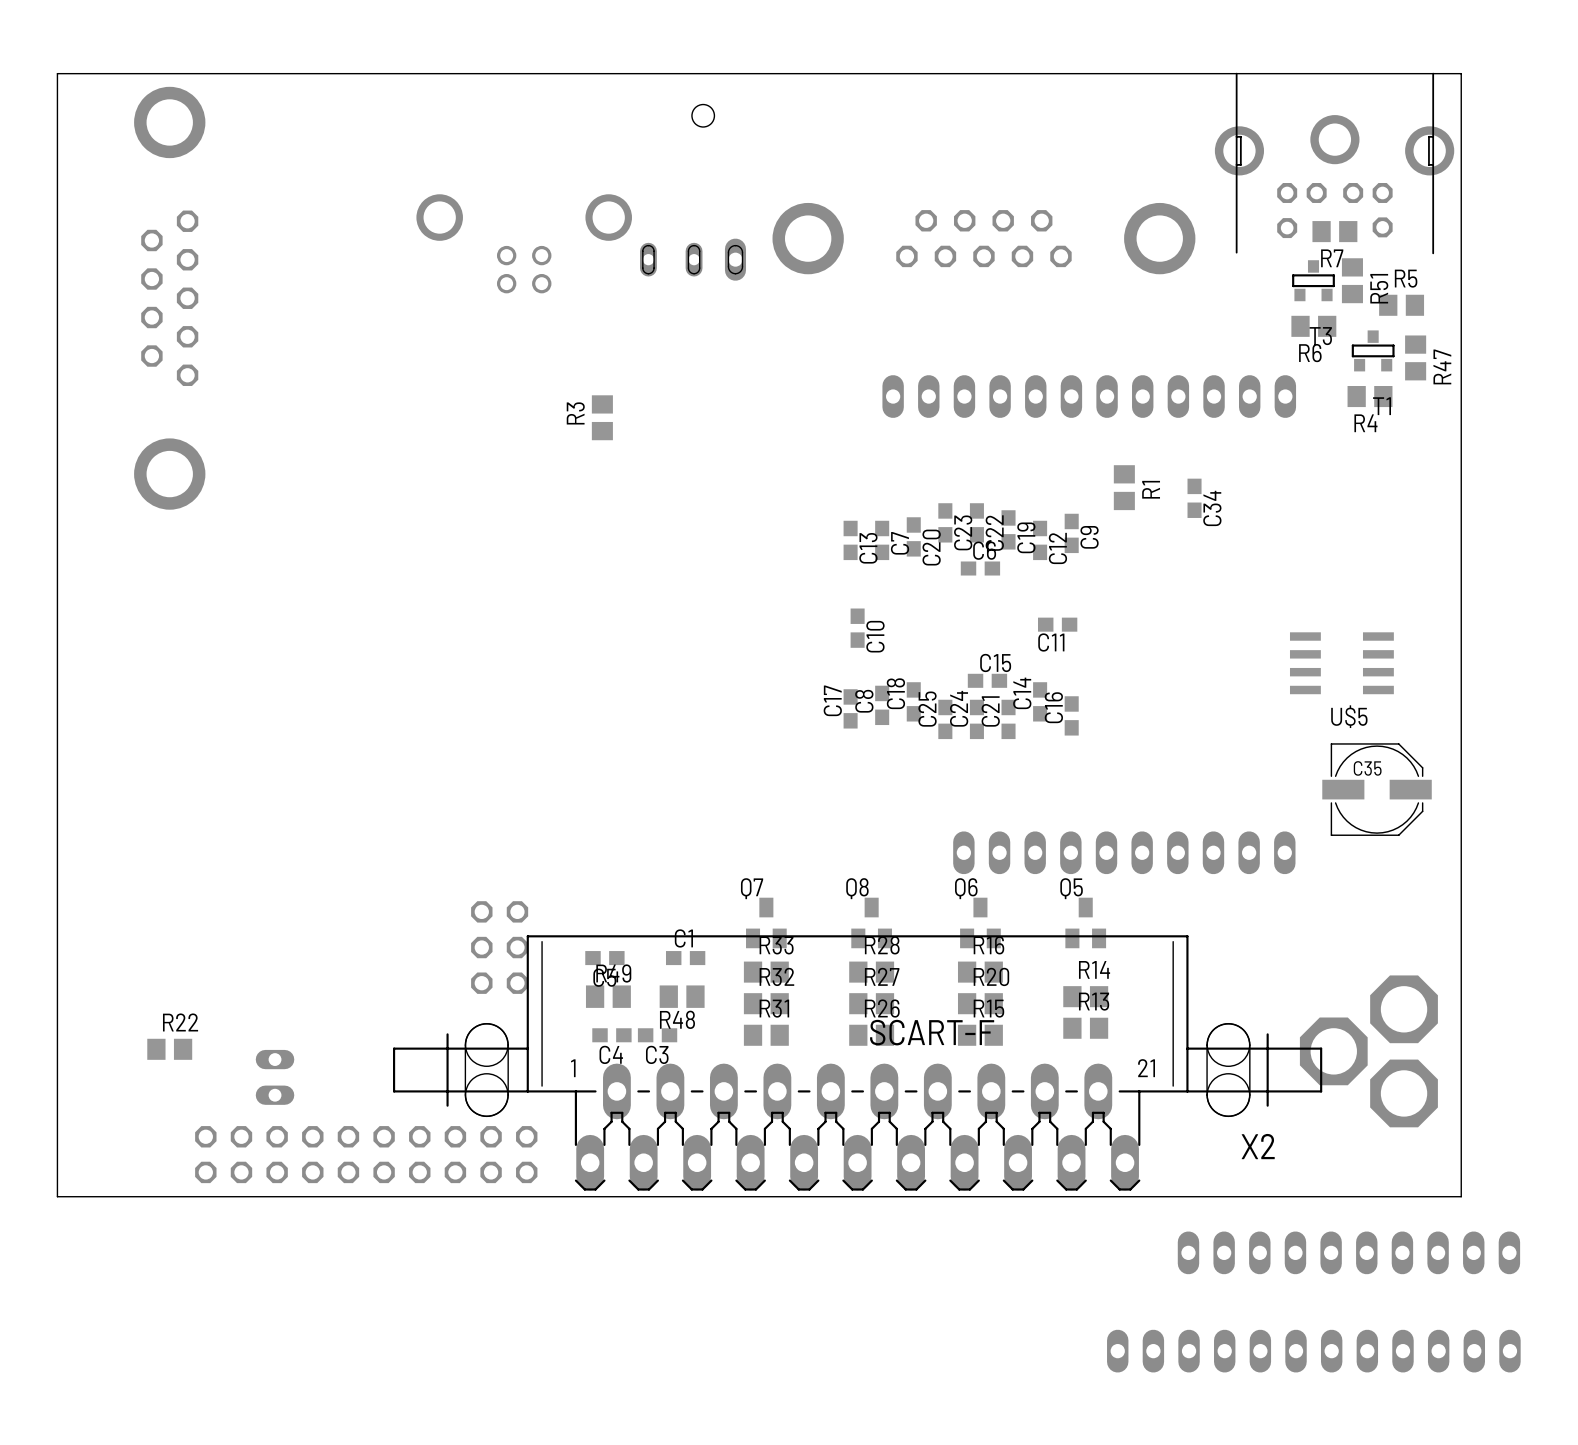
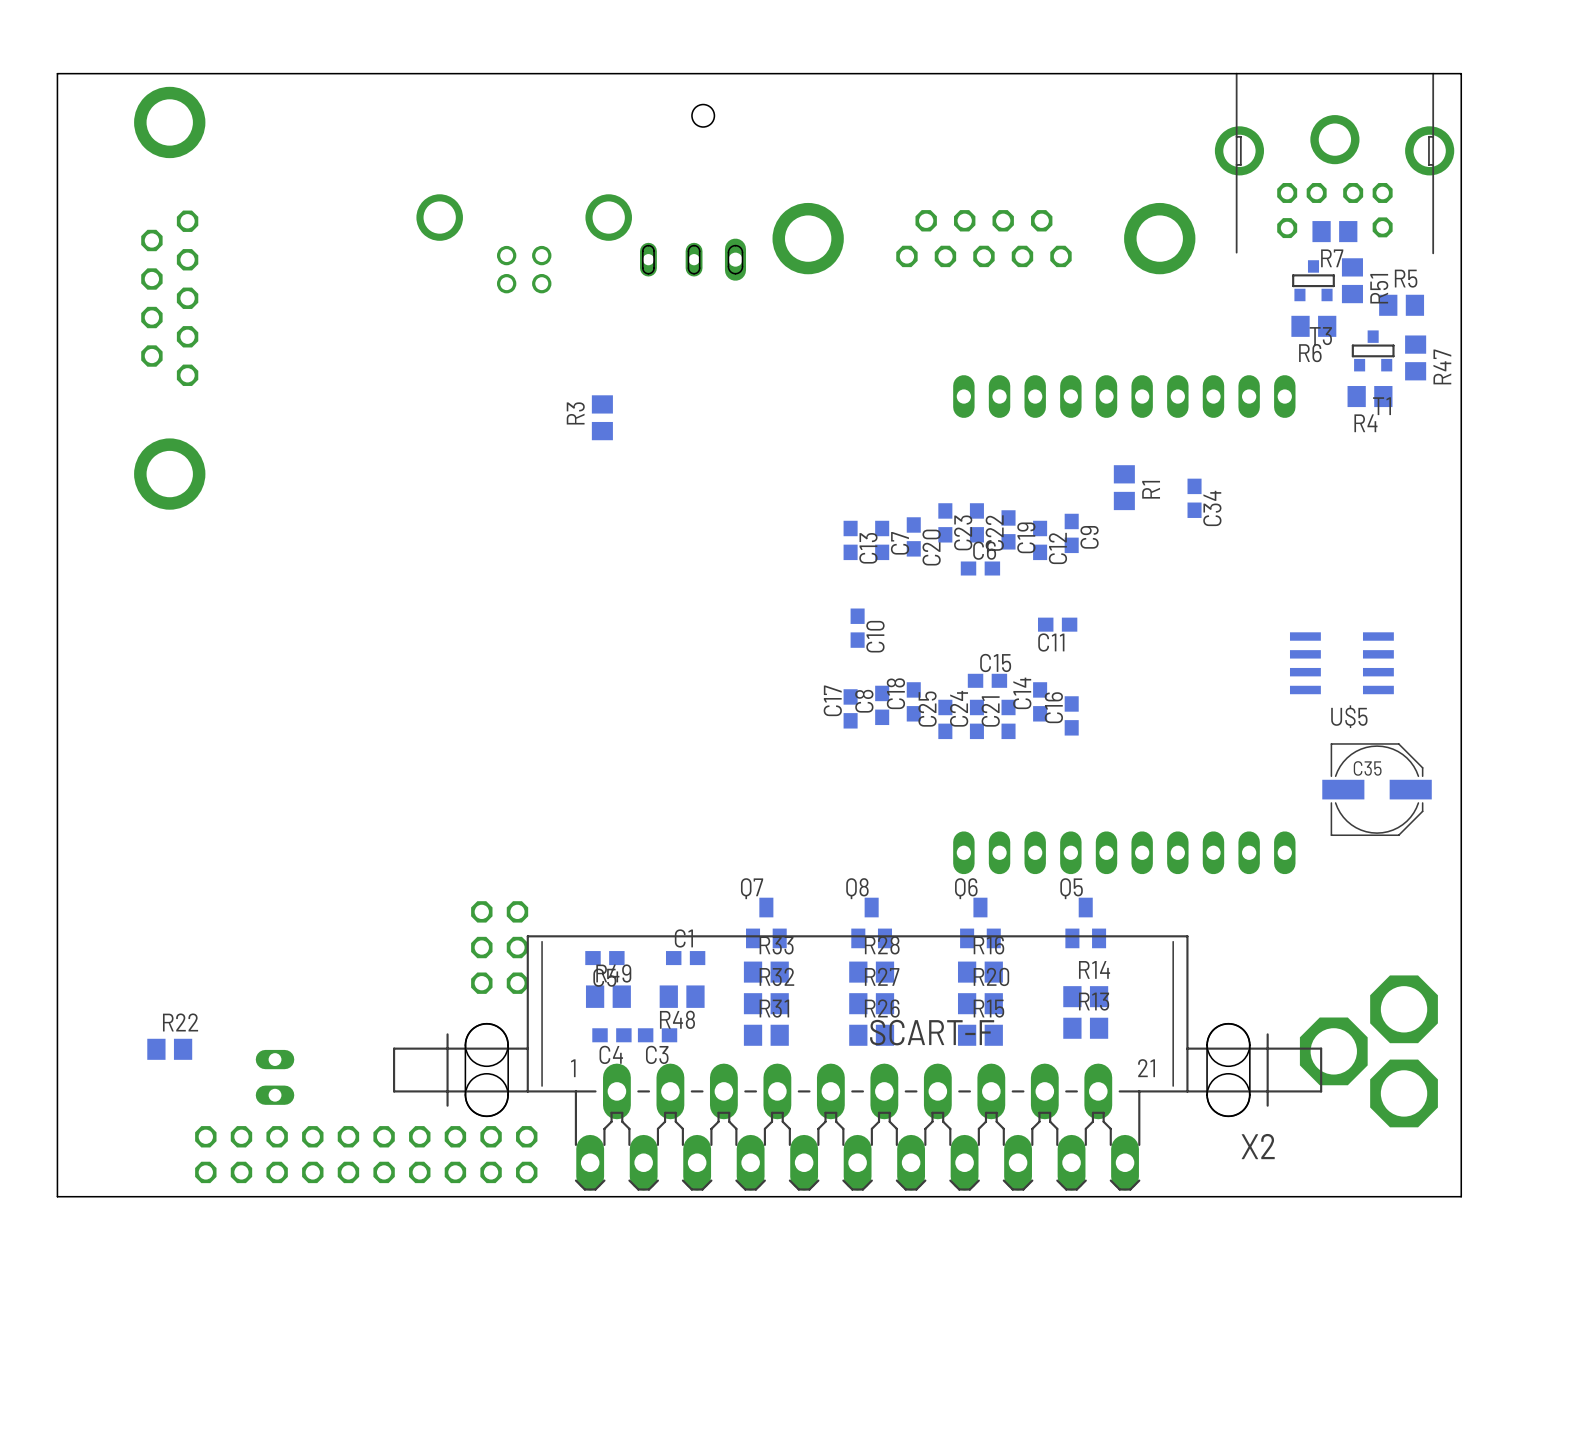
part: (1089, 396) -> none
part: none -> (1124, 396)
part: (1348, 1252) -> none
part: (1313, 1351) -> none

